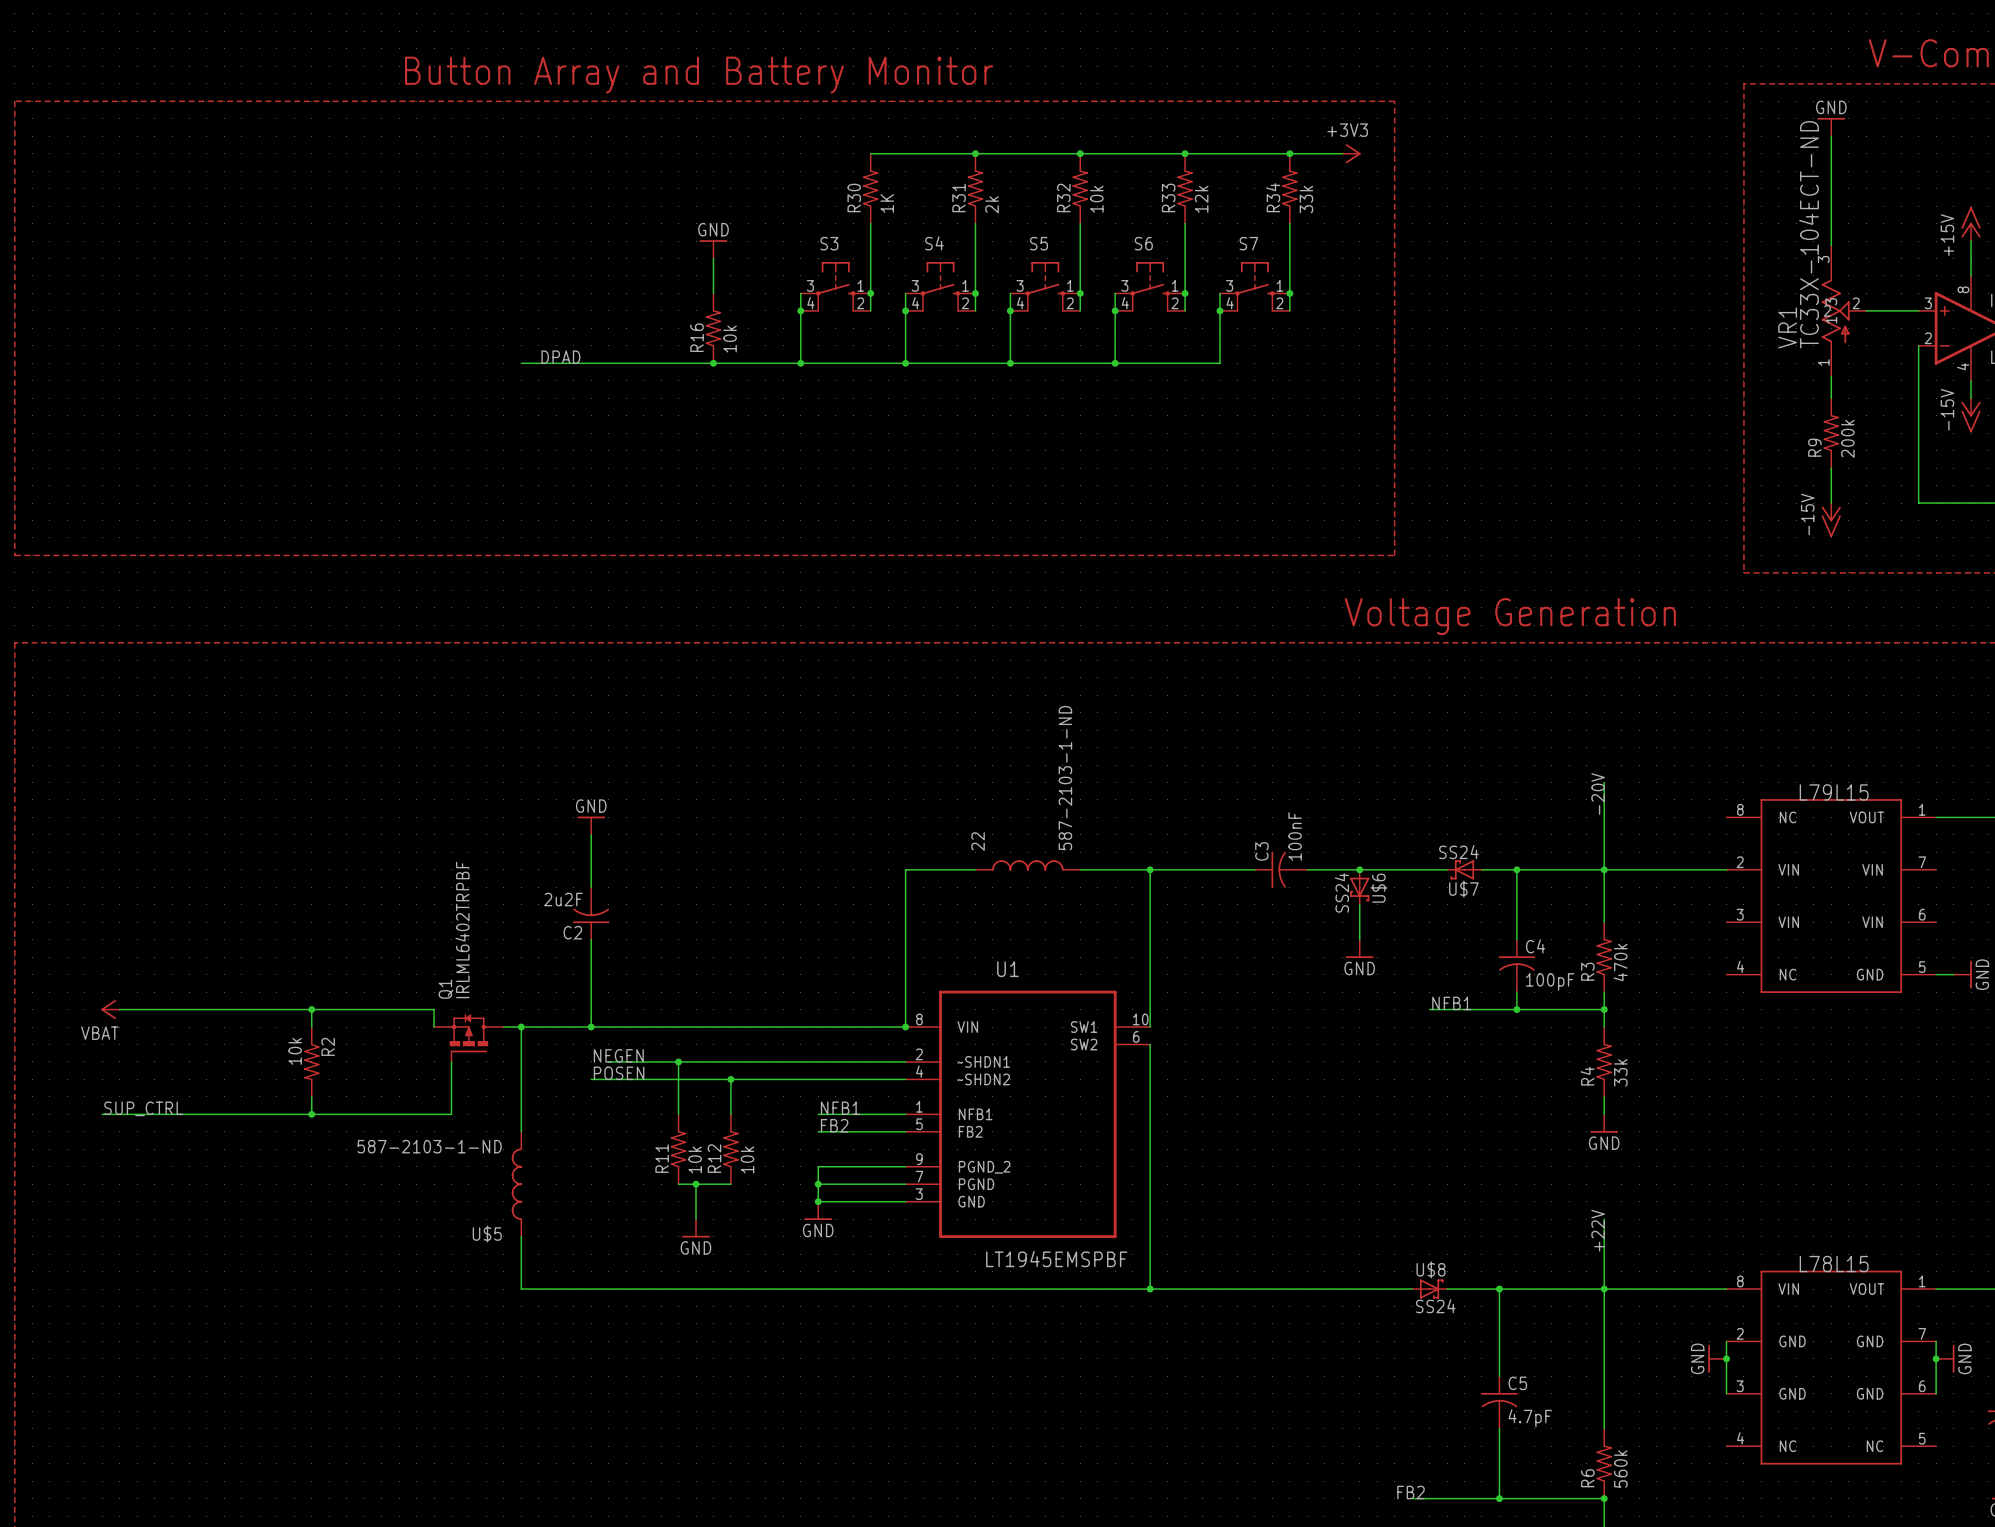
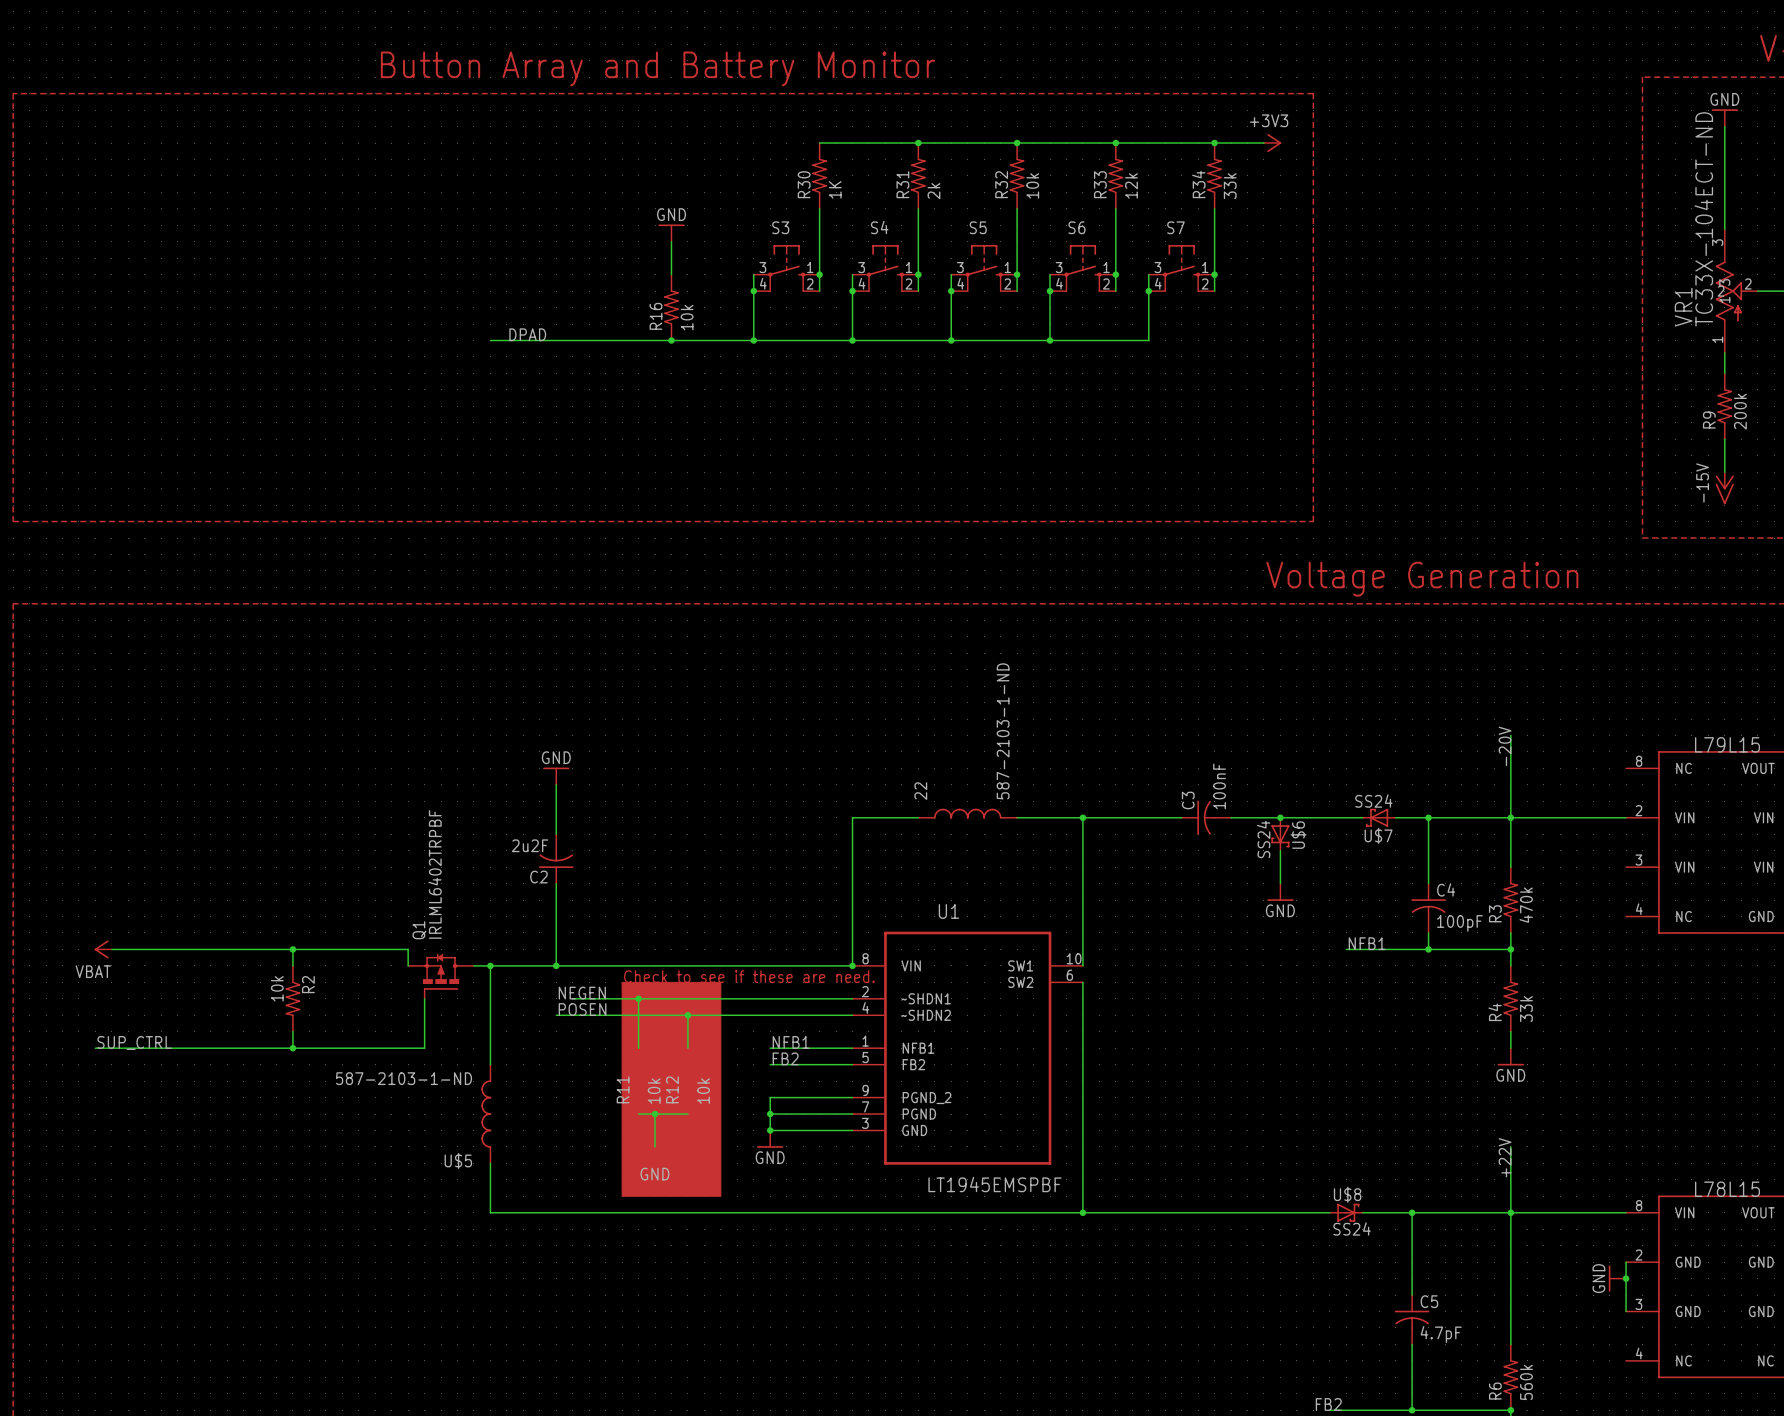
text: none -> Check to see if these are need. (749, 976)
drawing: none -> [621, 981, 722, 1197]

